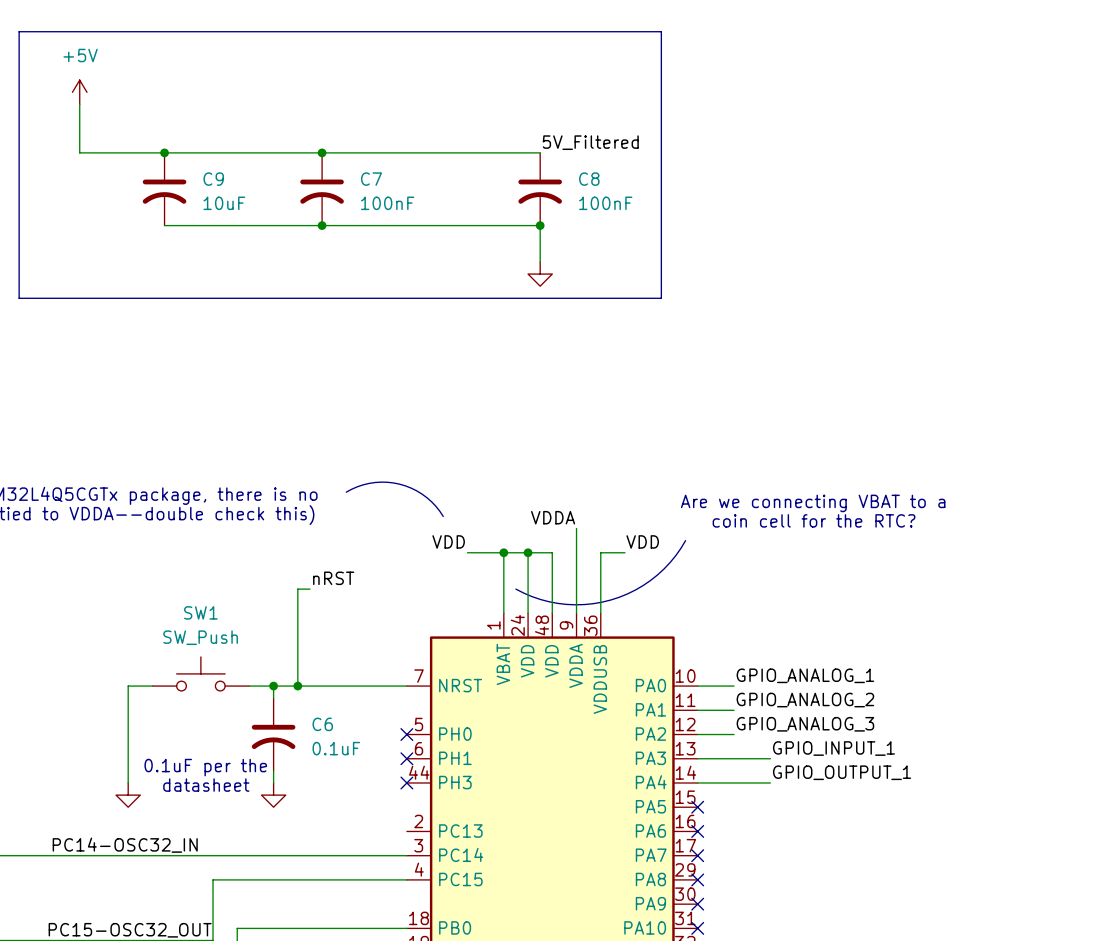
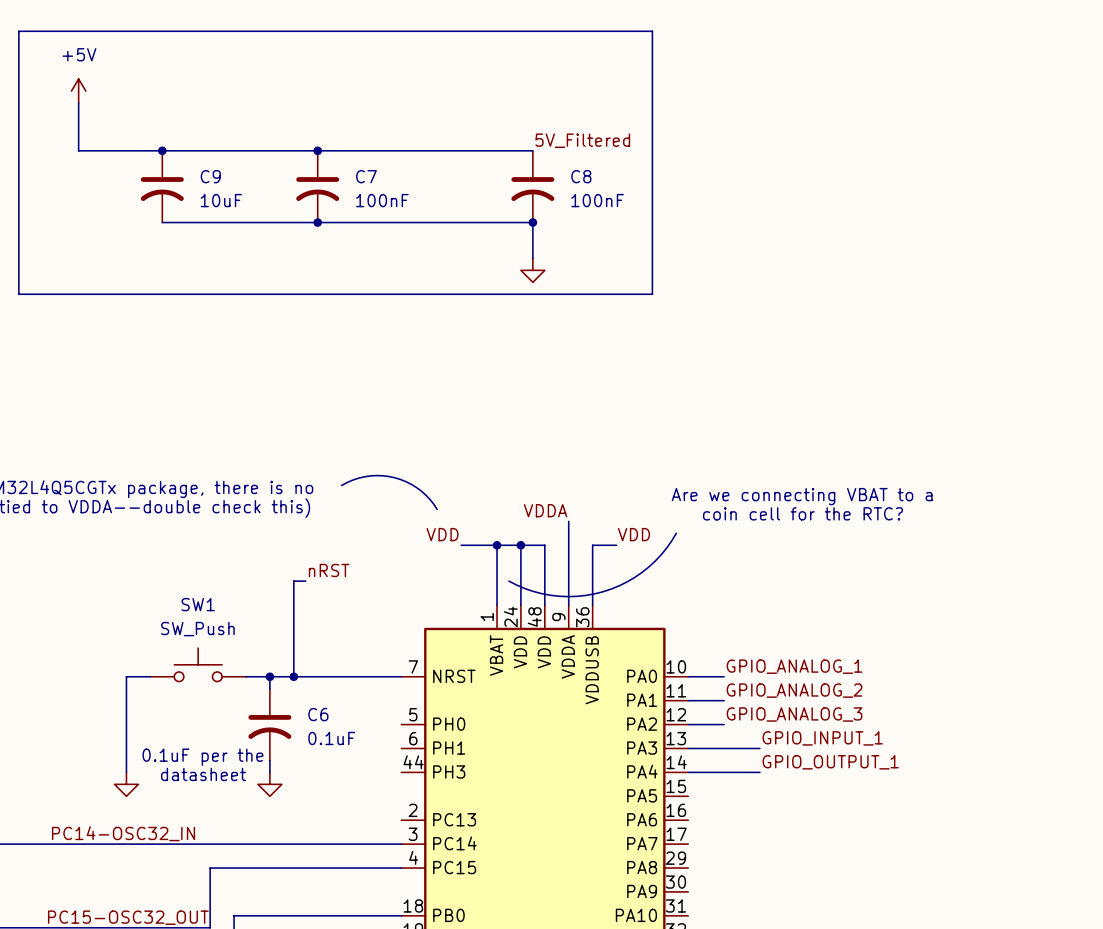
no-connect mark: (406, 734) -> none
no-connect mark: (406, 758) -> none
no-connect mark: (406, 782) -> none
no-connect mark: (697, 807) -> none
no-connect mark: (697, 831) -> none
no-connect mark: (697, 855) -> none
no-connect mark: (697, 879) -> none
no-connect mark: (697, 904) -> none
no-connect mark: (697, 928) -> none

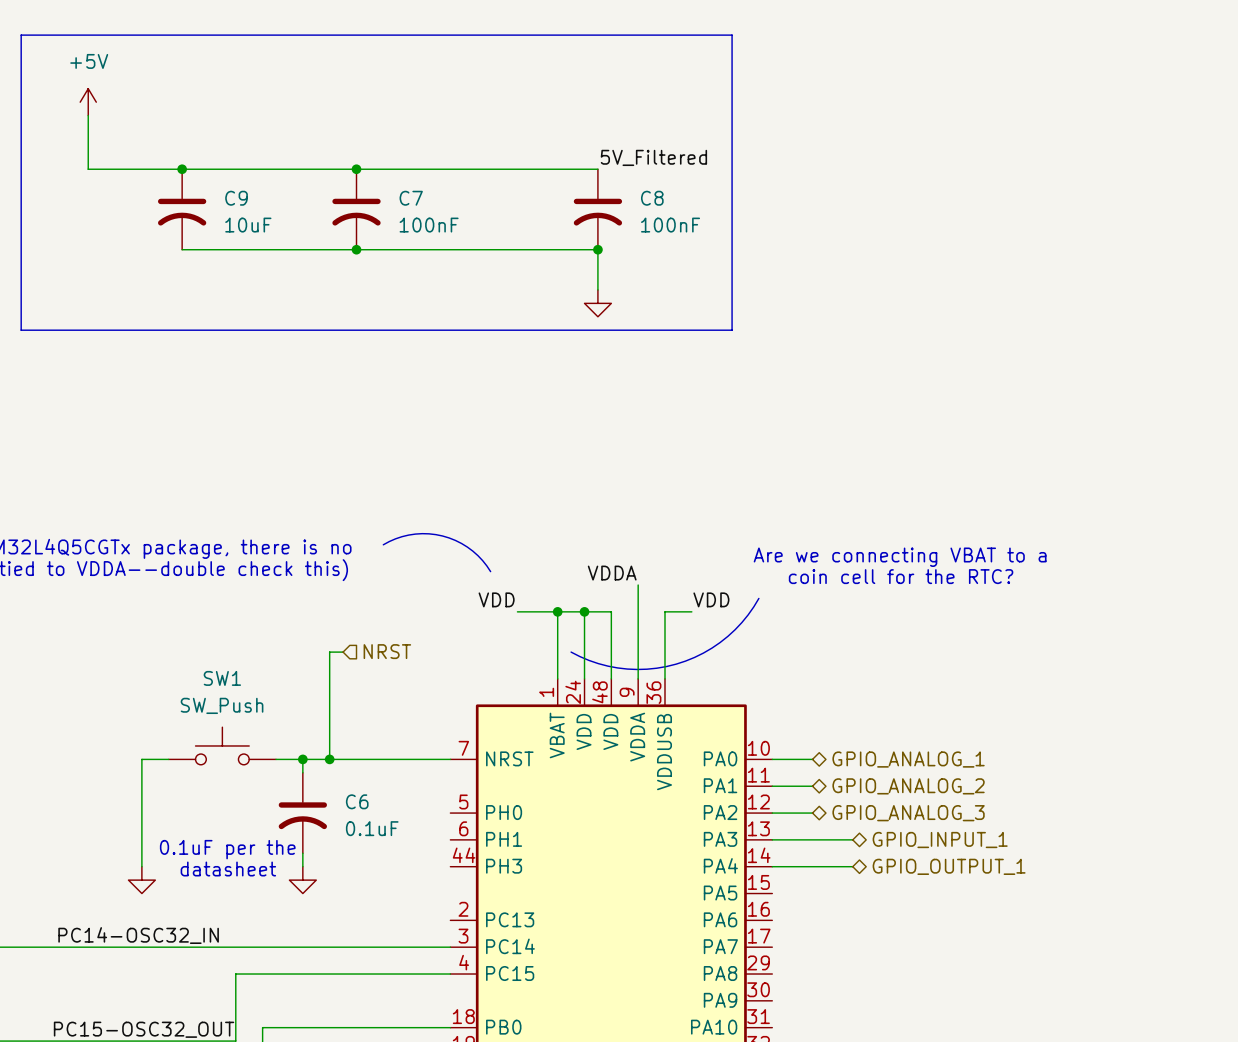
label: nRST (329, 570) -> none
hierarchical label: none -> NRST (387, 651)
label: GPIO_ANALOG_1 (794, 666) -> none
hierarchical label: none -> GPIO_ANALOG_1 (908, 759)
label: GPIO_ANALOG_2 (794, 690) -> none
hierarchical label: none -> GPIO_ANALOG_2 (908, 786)
label: GPIO_ANALOG_3 (794, 714) -> none
hierarchical label: none -> GPIO_ANALOG_3 (908, 813)
label: GPIO_INPUT_1 (822, 738) -> none
hierarchical label: none -> GPIO_INPUT_1 (940, 840)
label: GPIO_OUTPUT_1 (830, 762) -> none
hierarchical label: none -> GPIO_OUTPUT_1 (949, 866)

